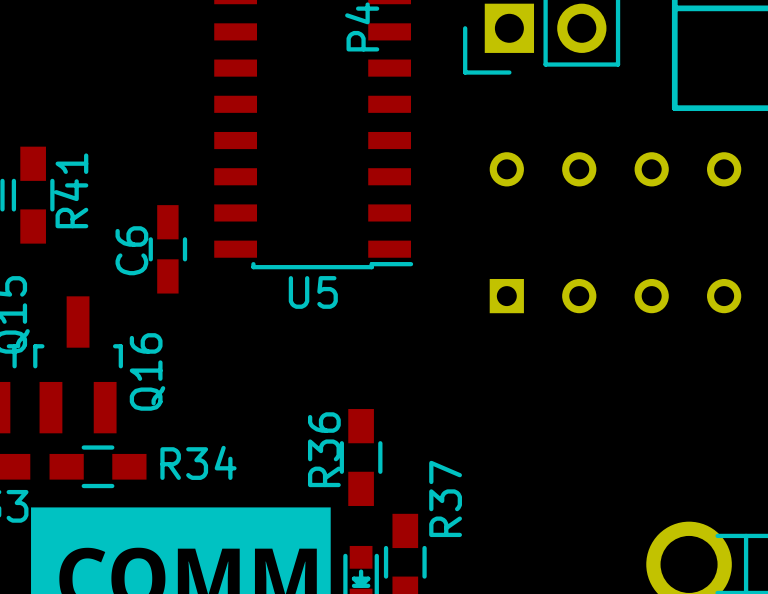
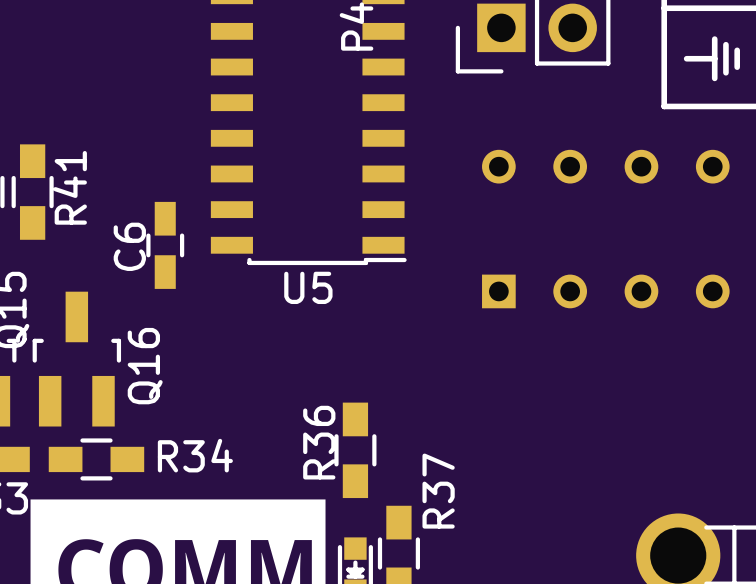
line: none -> (714, 39) (714, 78)
line: none -> (725, 44) (725, 72)
line: none -> (737, 50) (737, 67)
line: none -> (686, 58) (714, 58)

